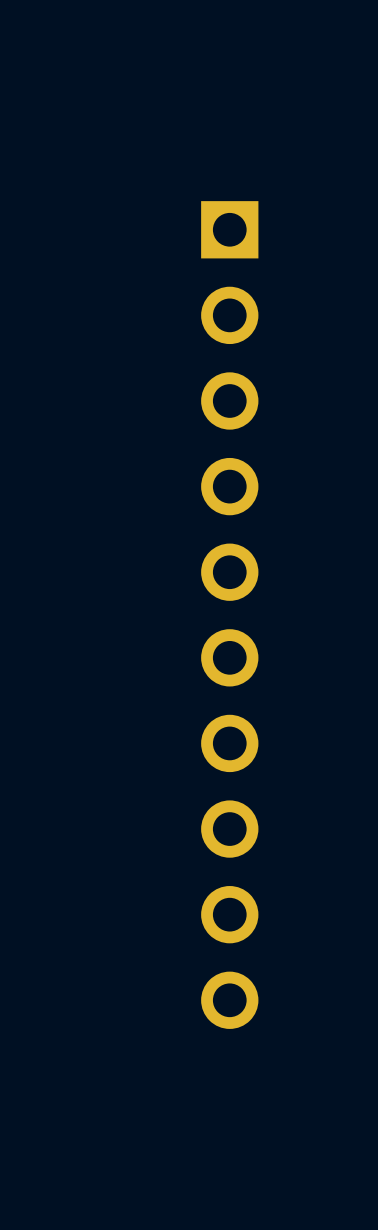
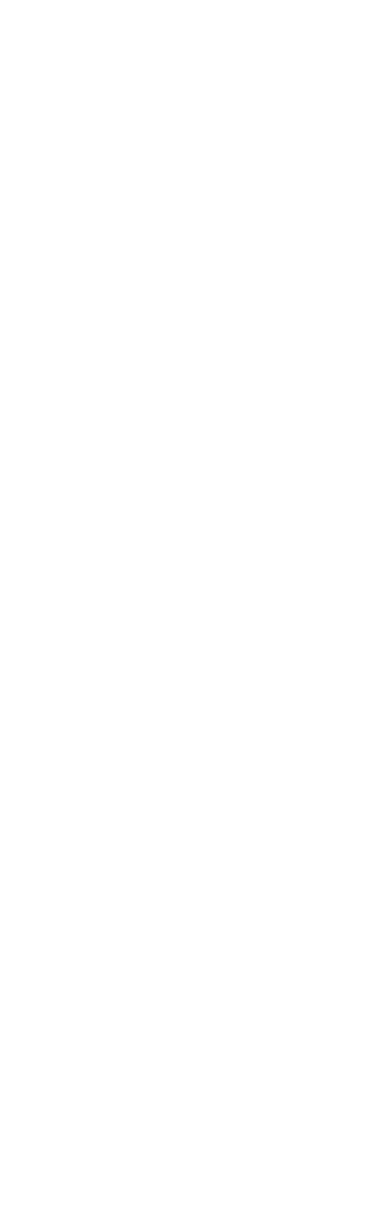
part: (229, 615) -> none

